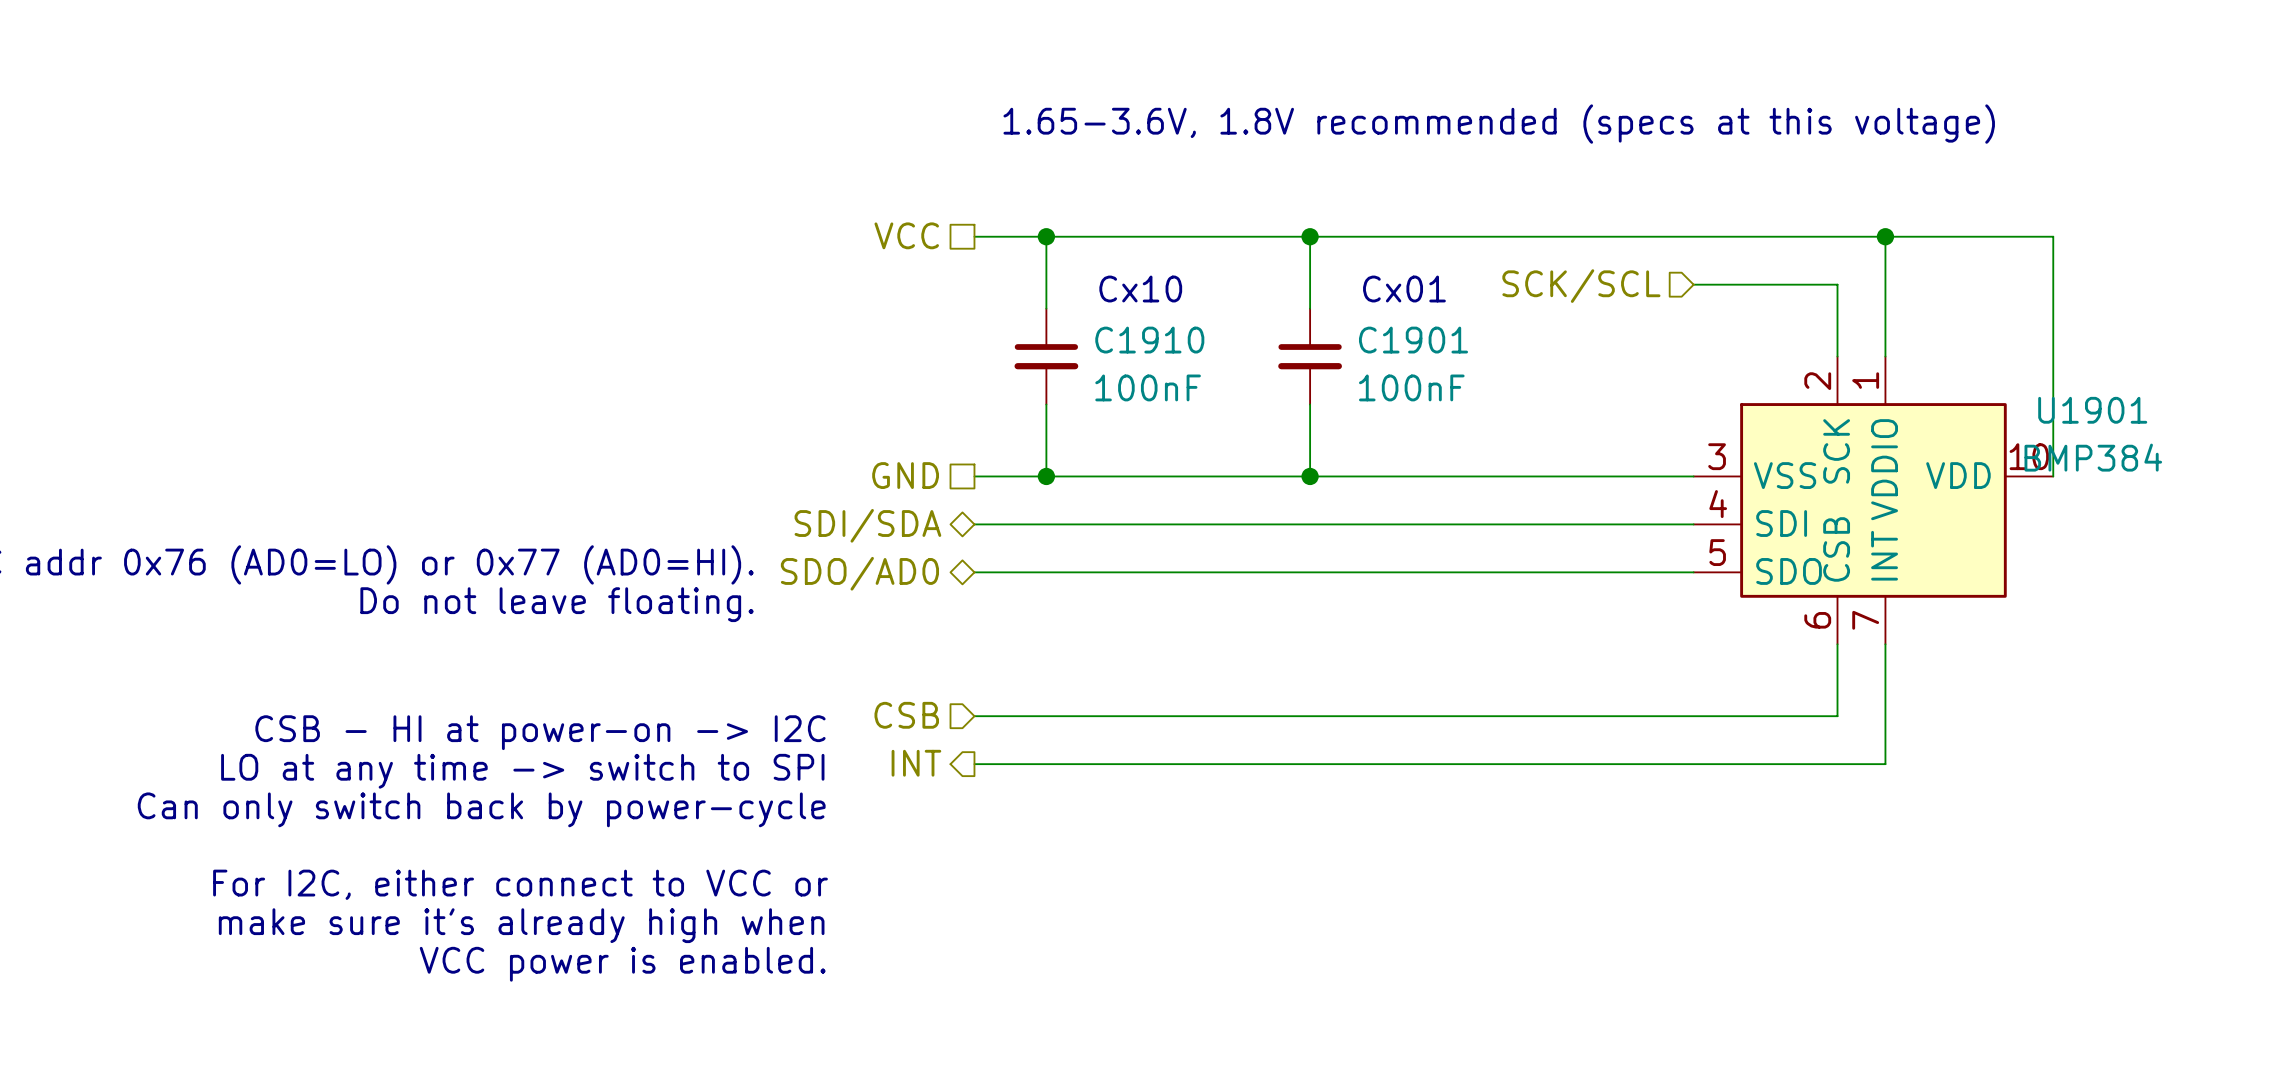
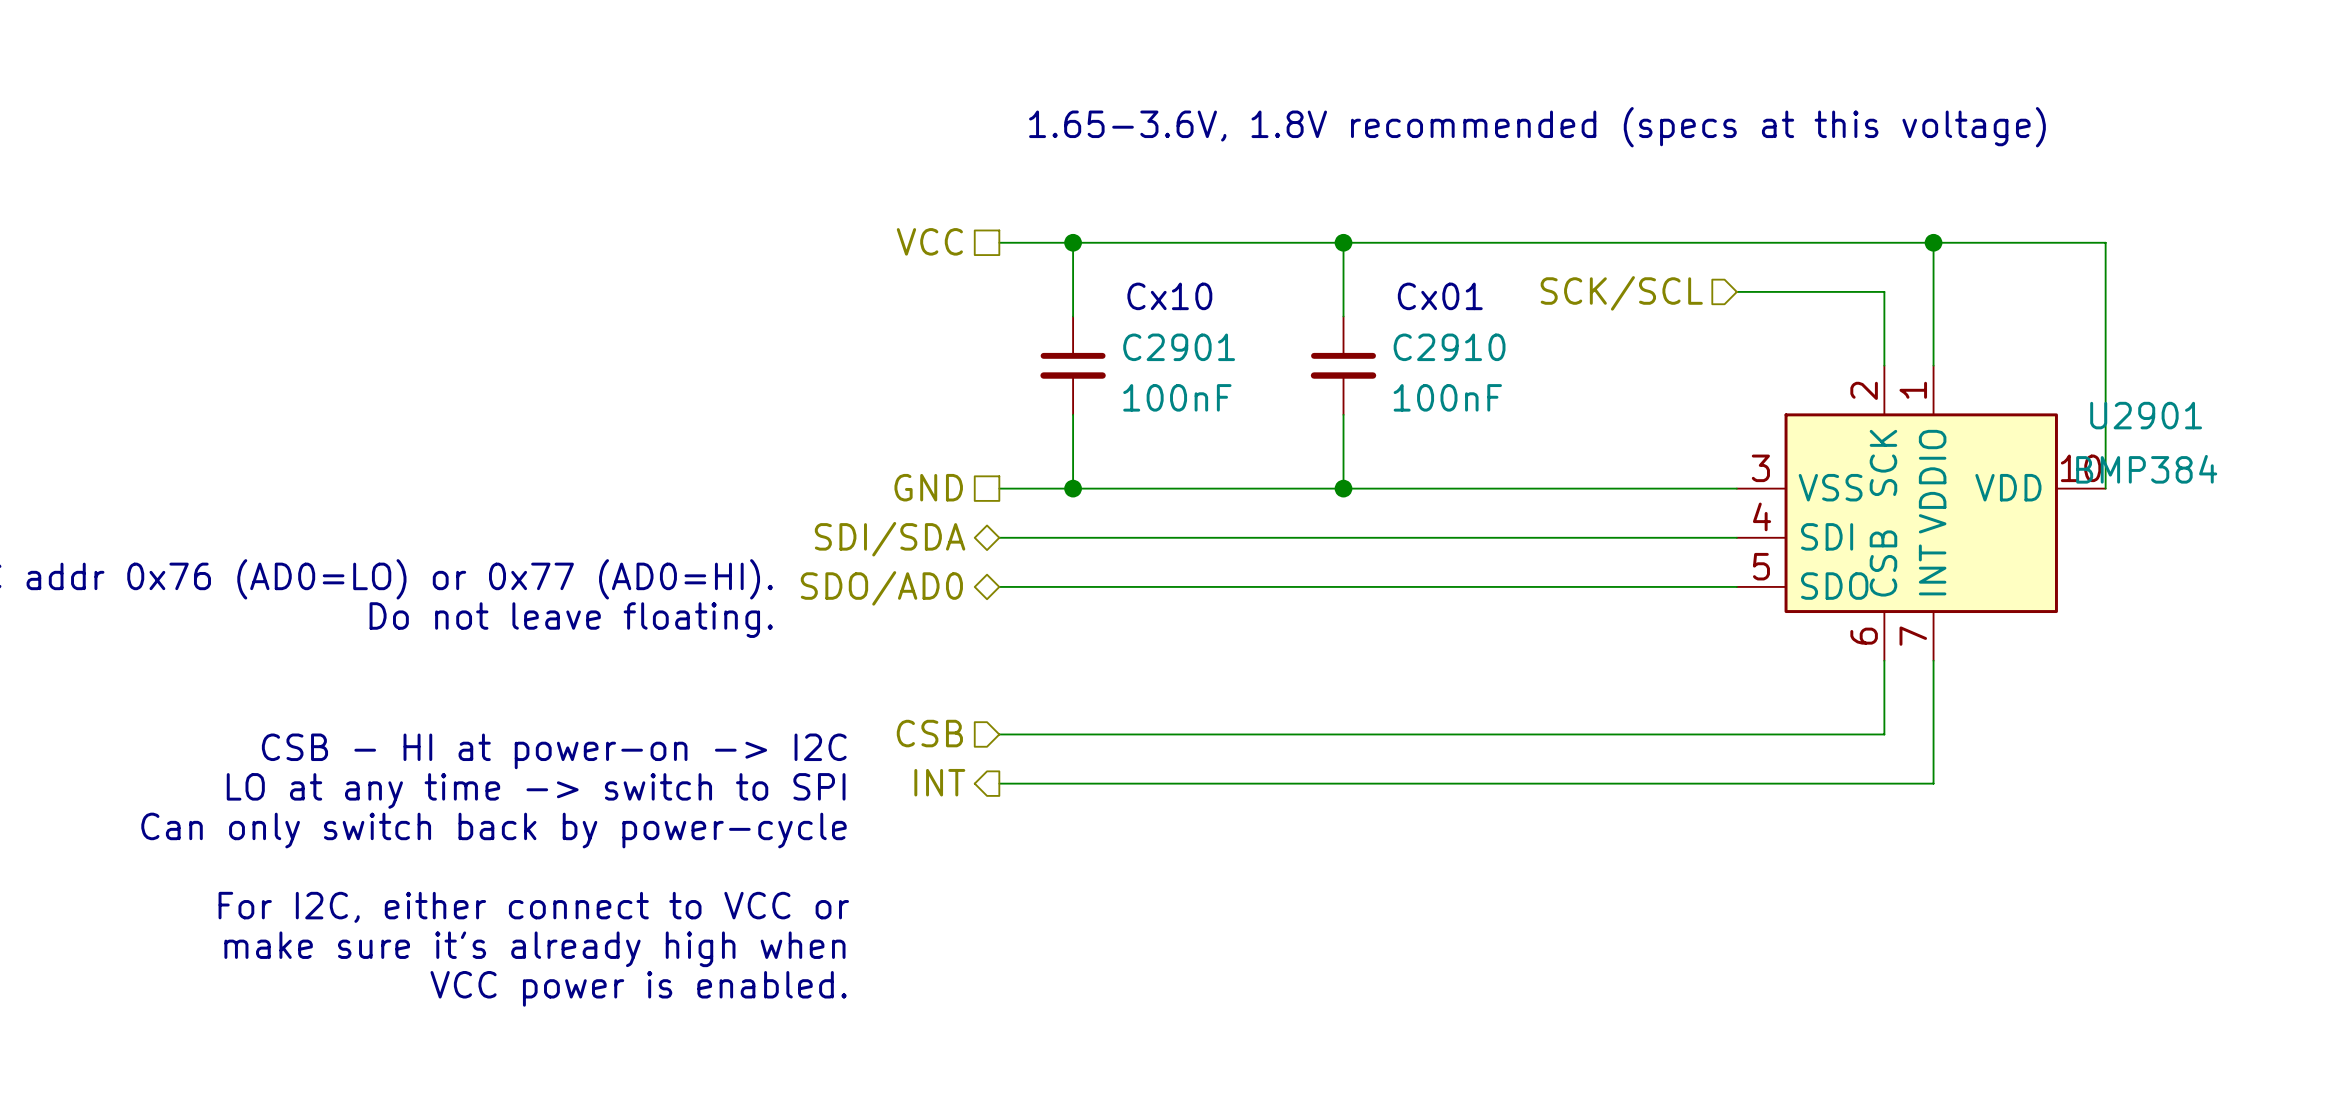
C1910 name: C1910 (1149, 340) -> C2901 (1179, 347)
C1901 name: C1901 (1413, 340) -> C2910 (1449, 347)
U1901 name: U1901 (2092, 410) -> U2901 (2146, 415)

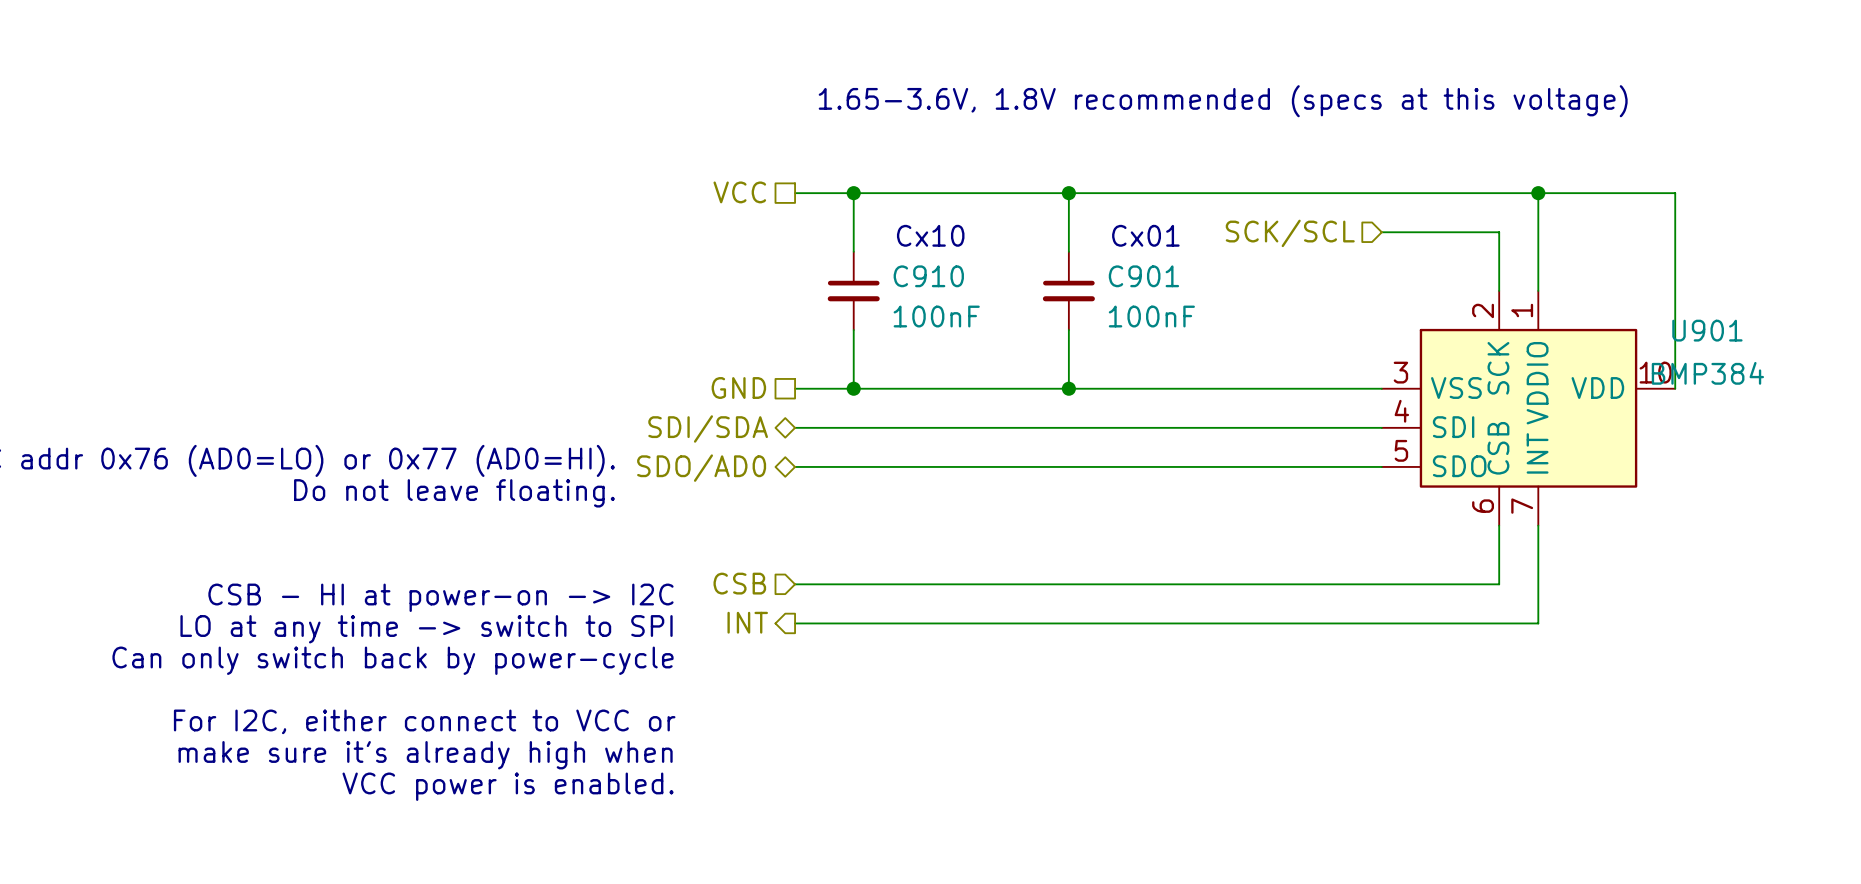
C2901 name: C2901 (1179, 347) -> C910 (928, 276)
C2910 name: C2910 (1449, 347) -> C901 (1143, 276)
U2901 name: U2901 (2146, 415) -> U901 (1707, 330)

